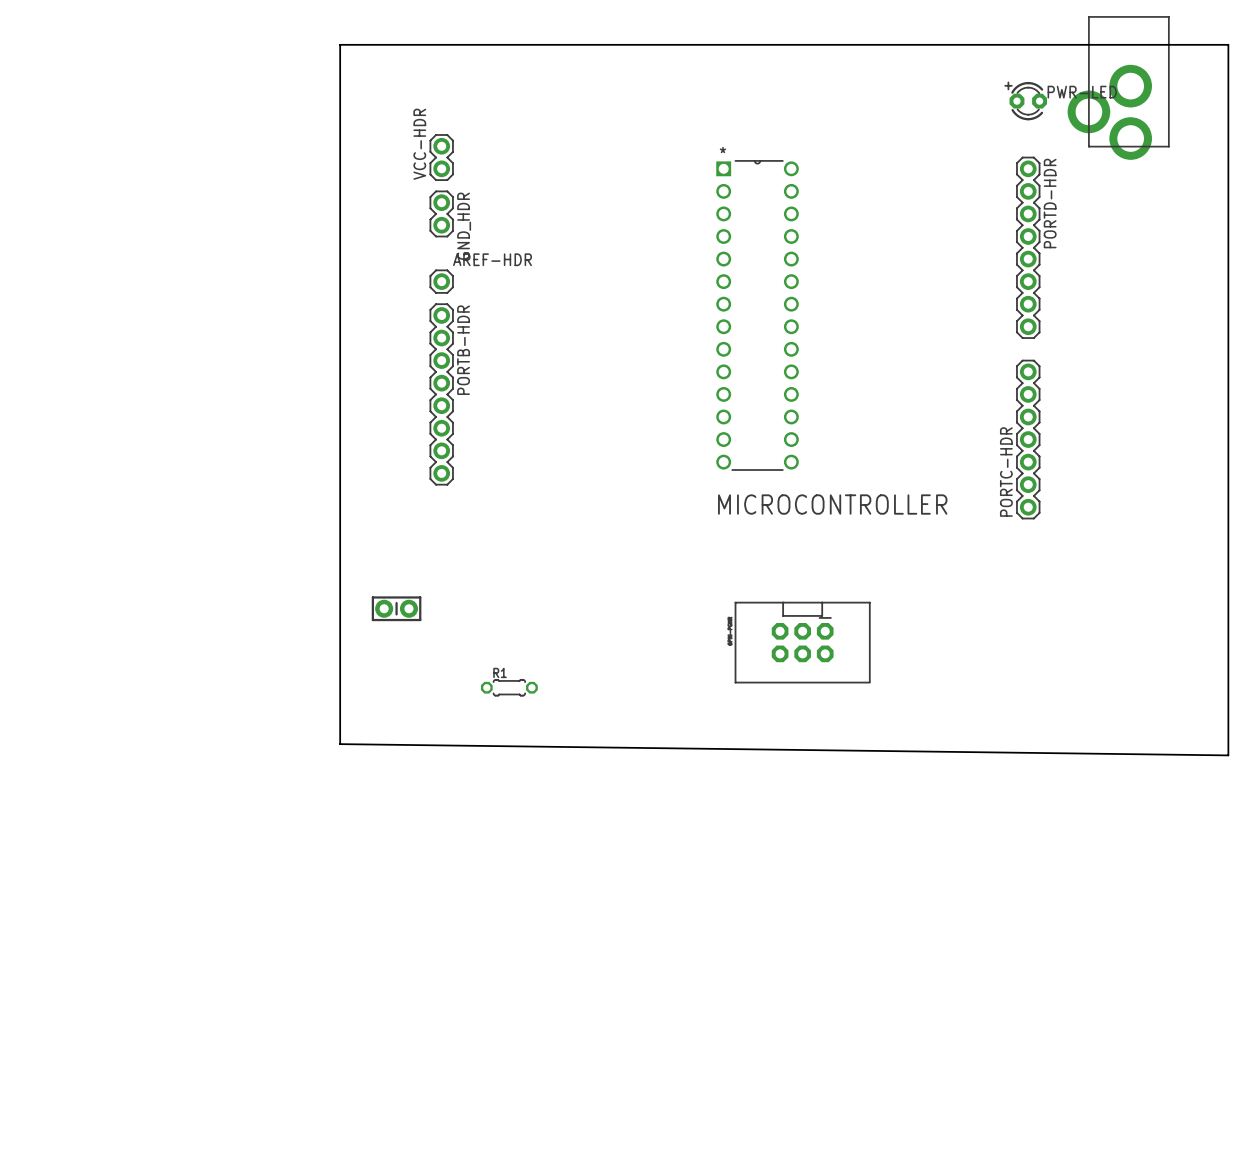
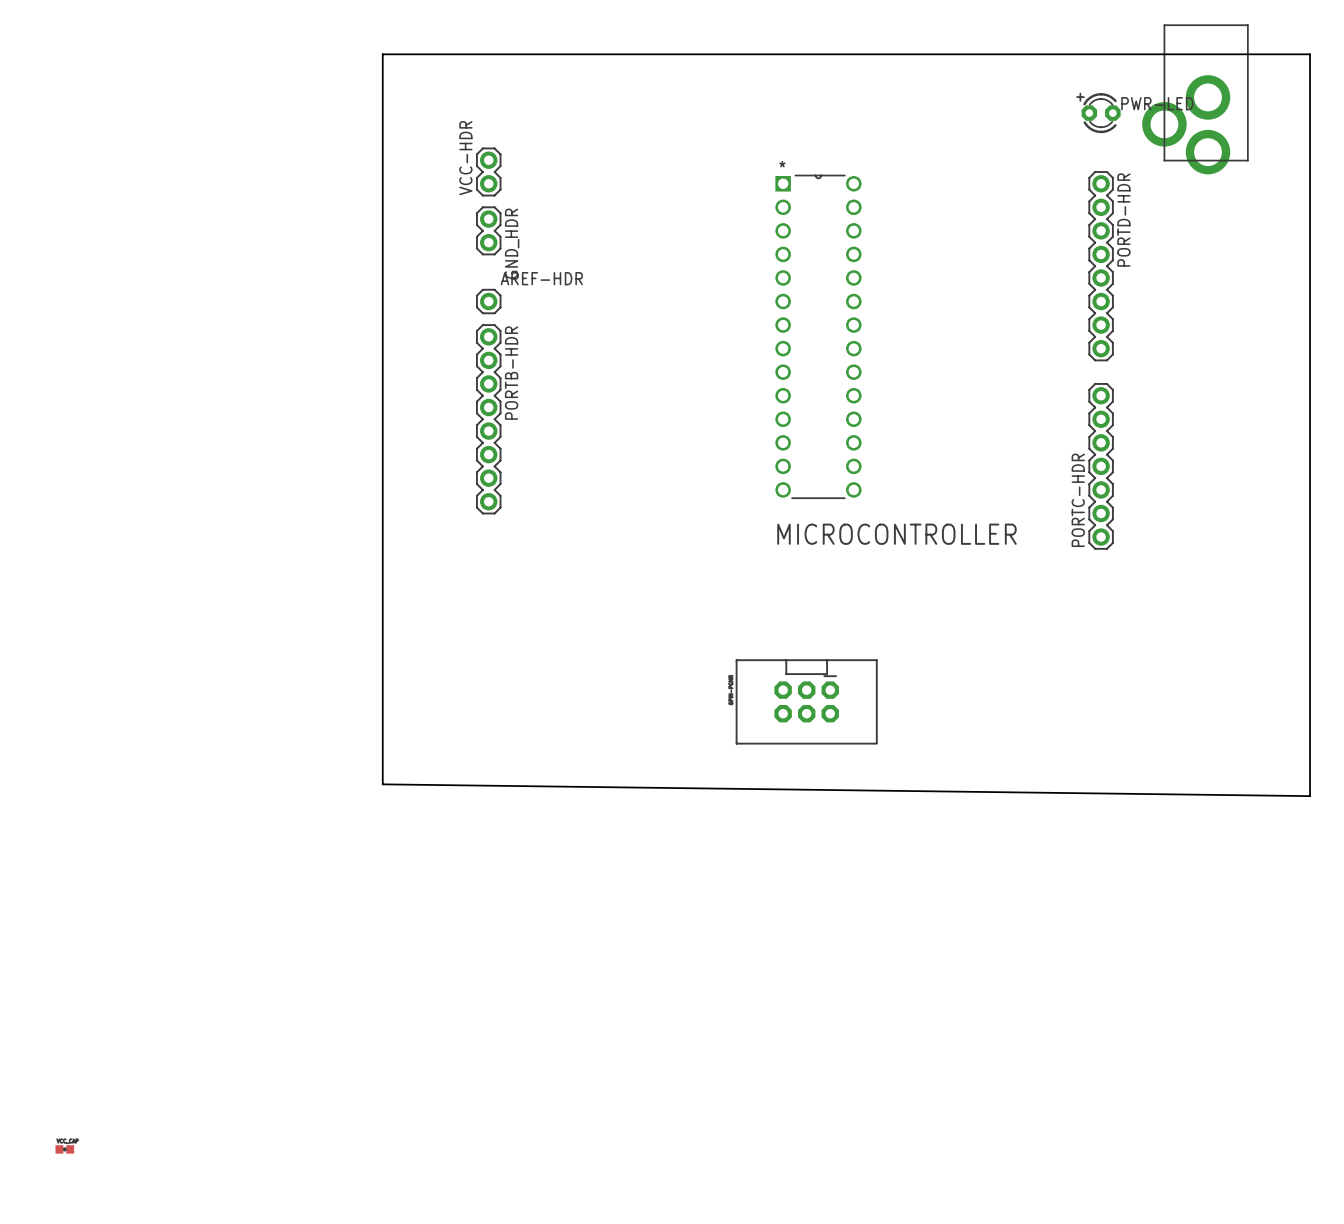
part: (396, 608) -> none
part position: (802, 642) -> (806, 701)
R1: (509, 687) -> none
part: none -> (64, 1149)

